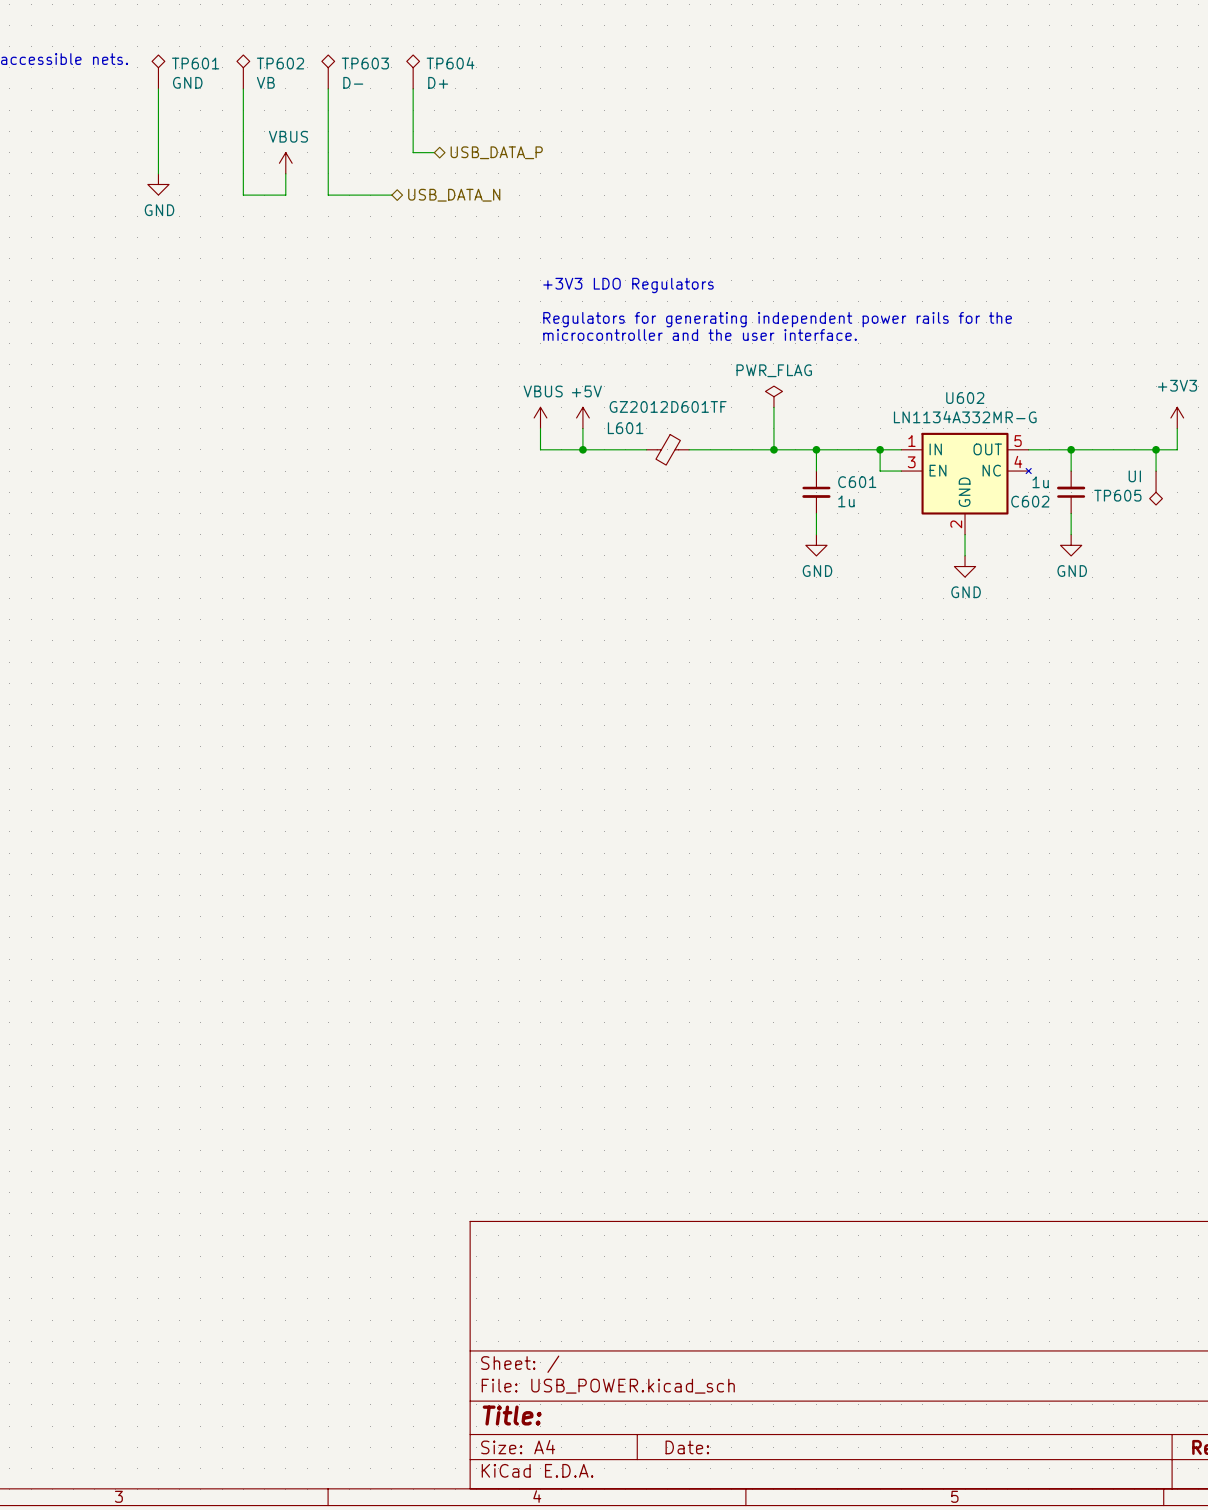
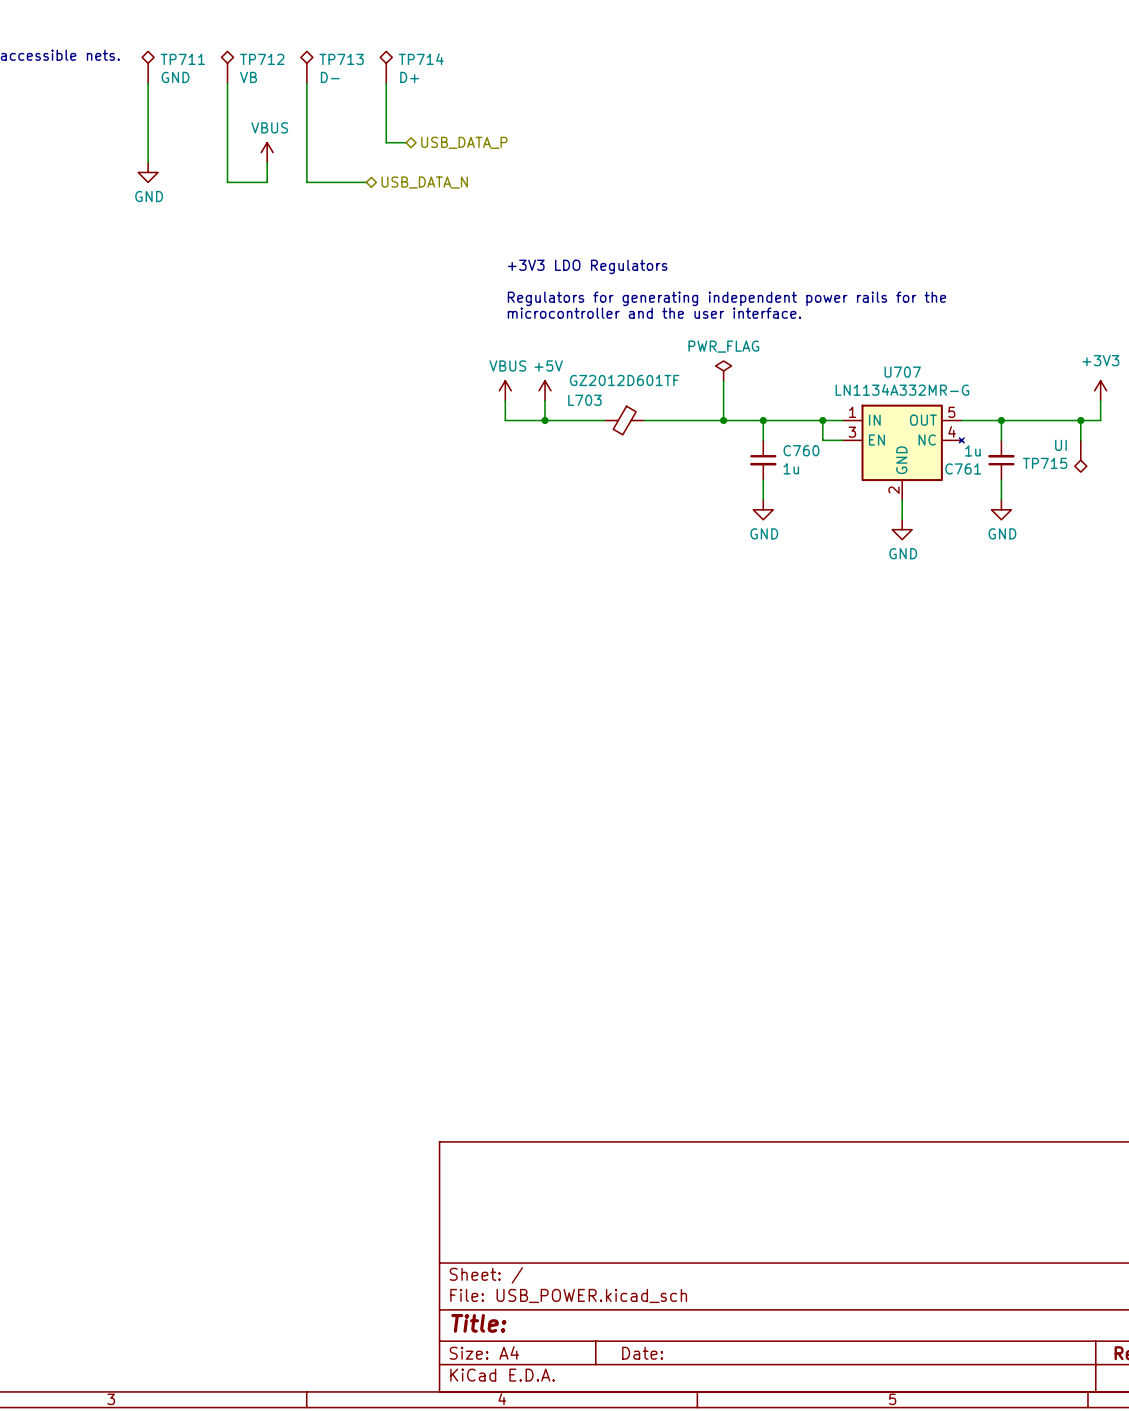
TP601 name: TP601 (195, 63) -> TP711 (182, 59)
TP602 name: TP602 (280, 63) -> TP712 (262, 59)
TP603 name: TP603 (365, 63) -> TP713 (341, 59)
TP604 name: TP604 (450, 63) -> TP714 (421, 59)
U602 name: U602 (965, 398) -> U707 (902, 372)
L601 name: L601 (625, 428) -> L703 (584, 400)
C601 name: C601 (857, 482) -> C760 (801, 450)
TP605 name: TP605 (1117, 495) -> TP715 (1045, 463)
C602 name: C602 (1030, 501) -> C761 (963, 468)

